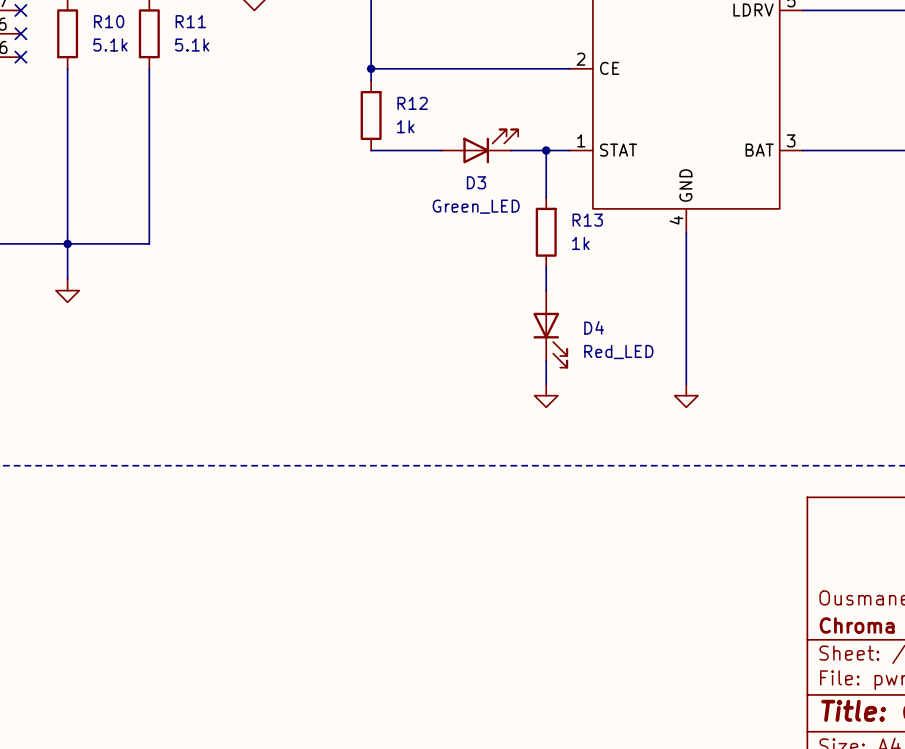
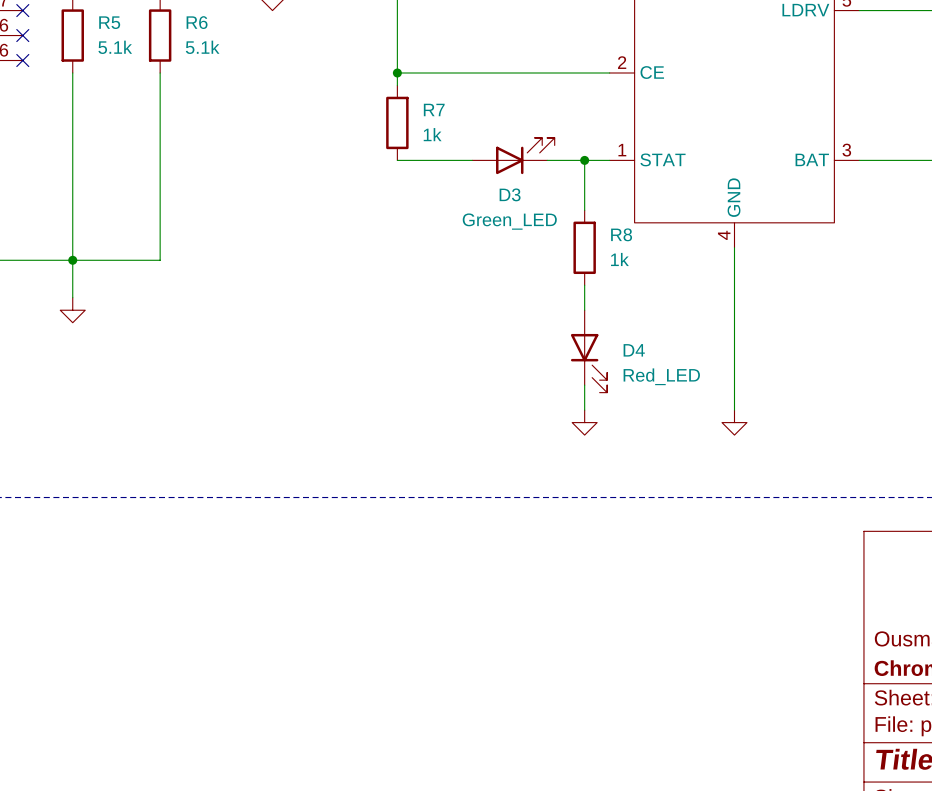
R10 name: R10 (109, 21) -> R5 (109, 22)
R11 name: R11 (190, 21) -> R6 (197, 22)
R12 name: R12 (412, 103) -> R7 (434, 109)
R13 name: R13 (587, 220) -> R8 (621, 234)

